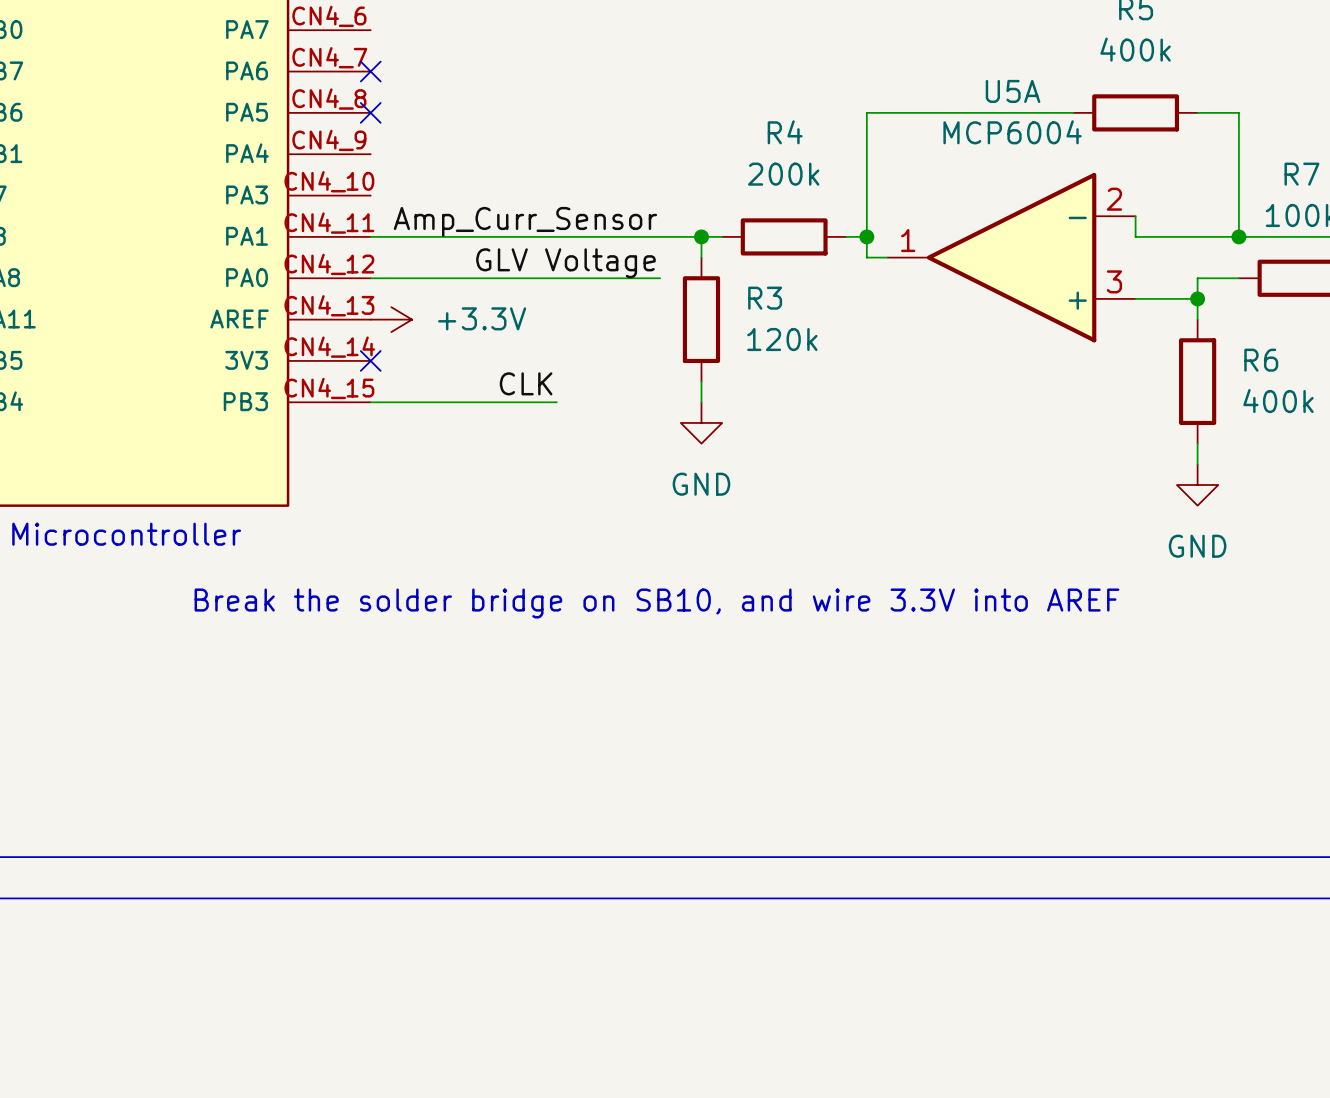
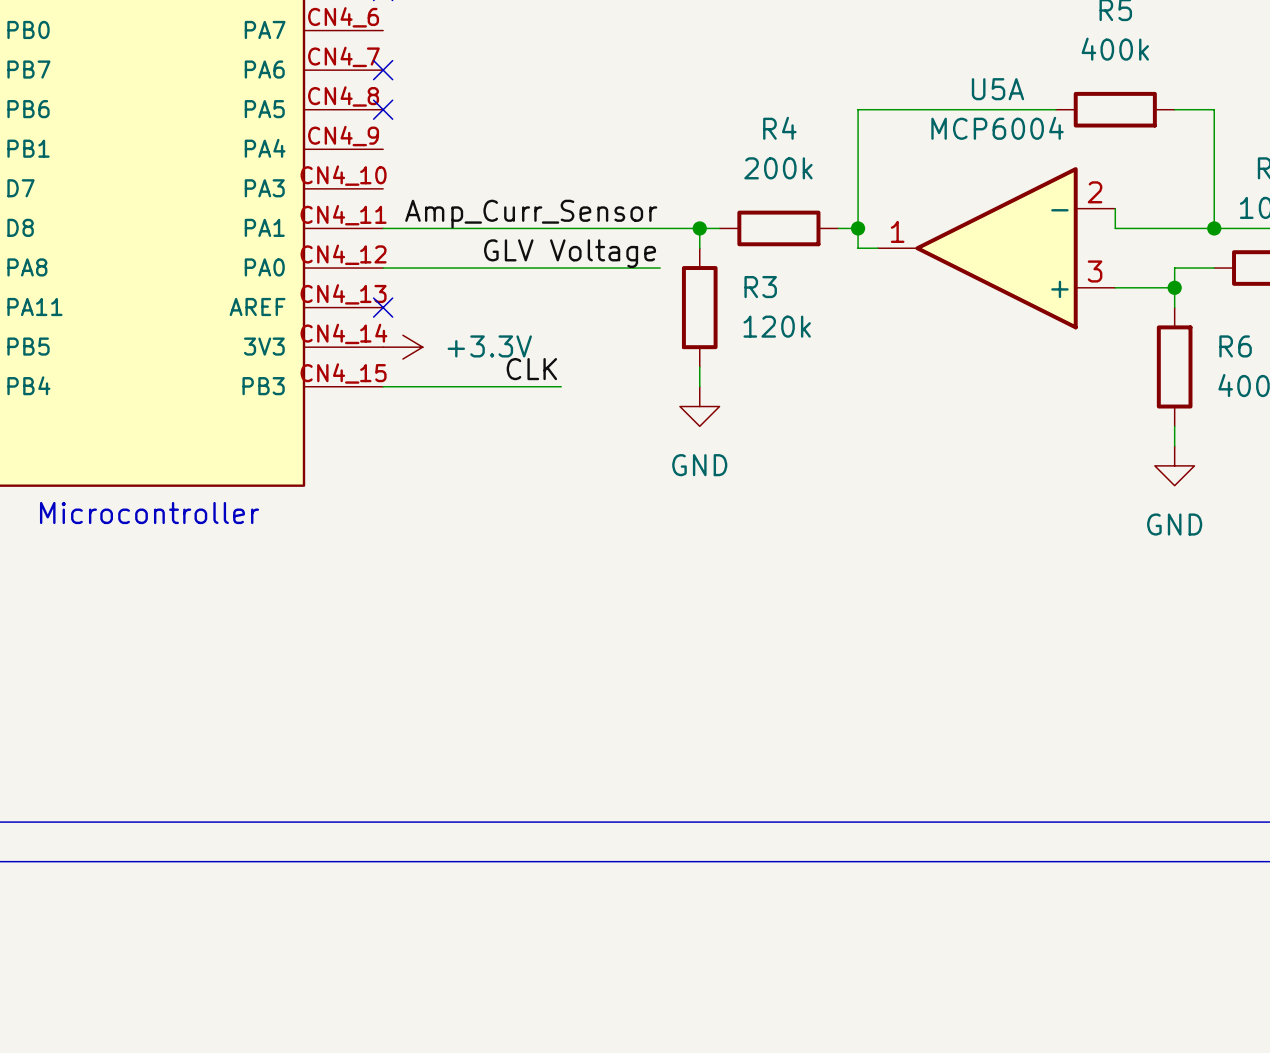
power symbol position: +3.3V (391, 319) -> +3.3V (402, 347)
no-connect mark position: (370, 360) -> (383, 307)
text: Break the solder bridge on SB10, and wire 3.3V into AREF (656, 603) -> none

